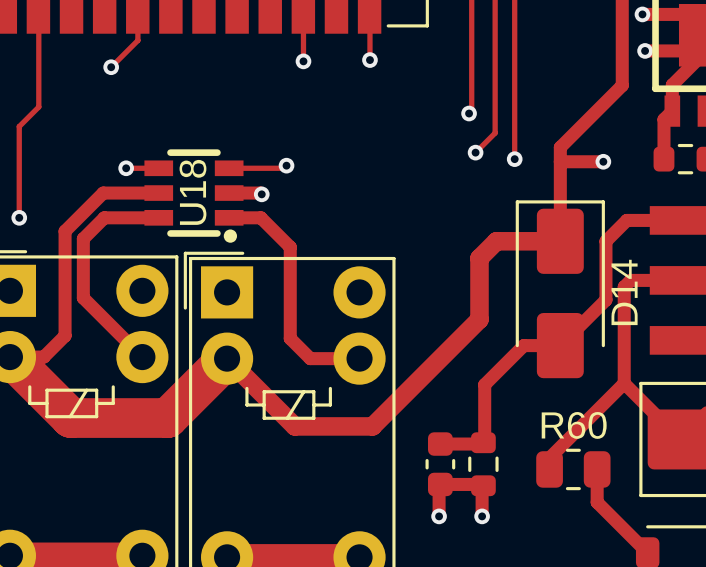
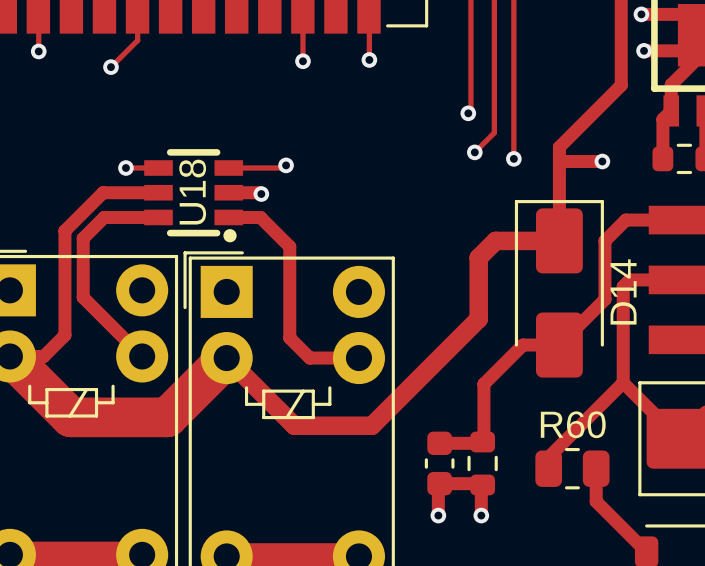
track: (38, 51) (38, 107) (19, 126) (19, 217) -> none
via: none -> (38, 51)
via: (19, 217) -> none

